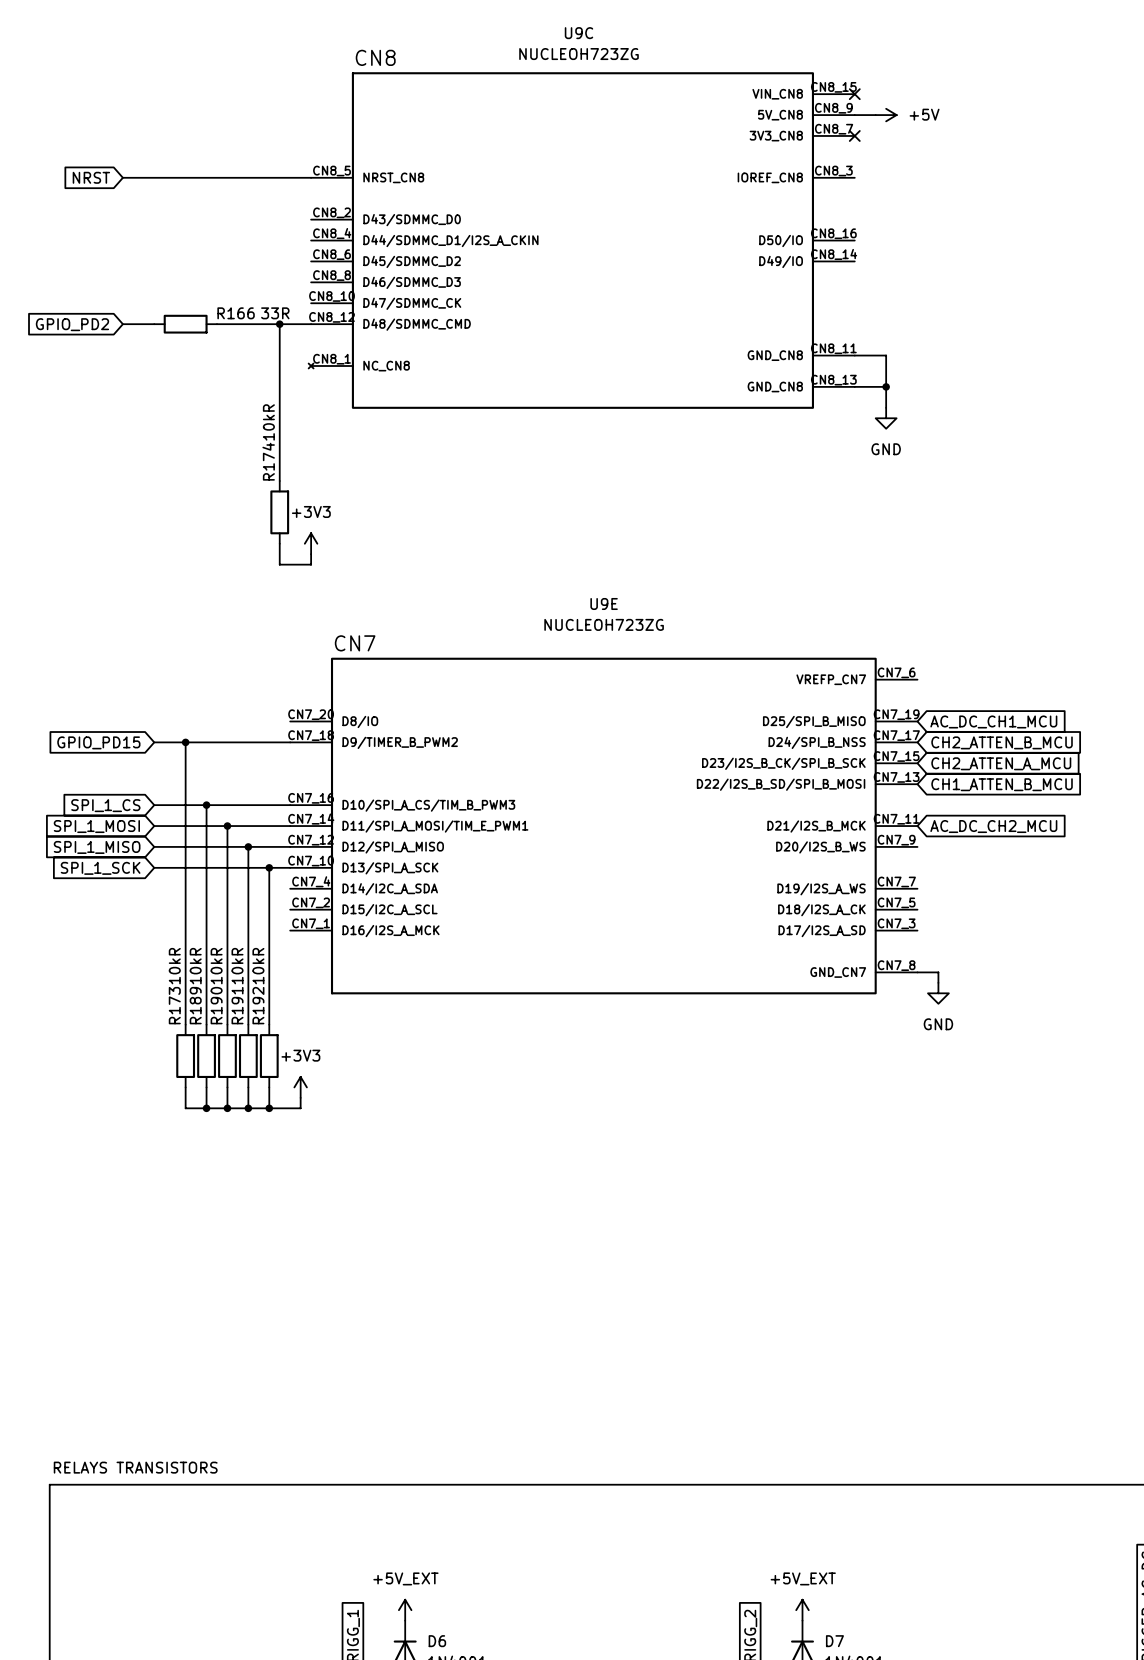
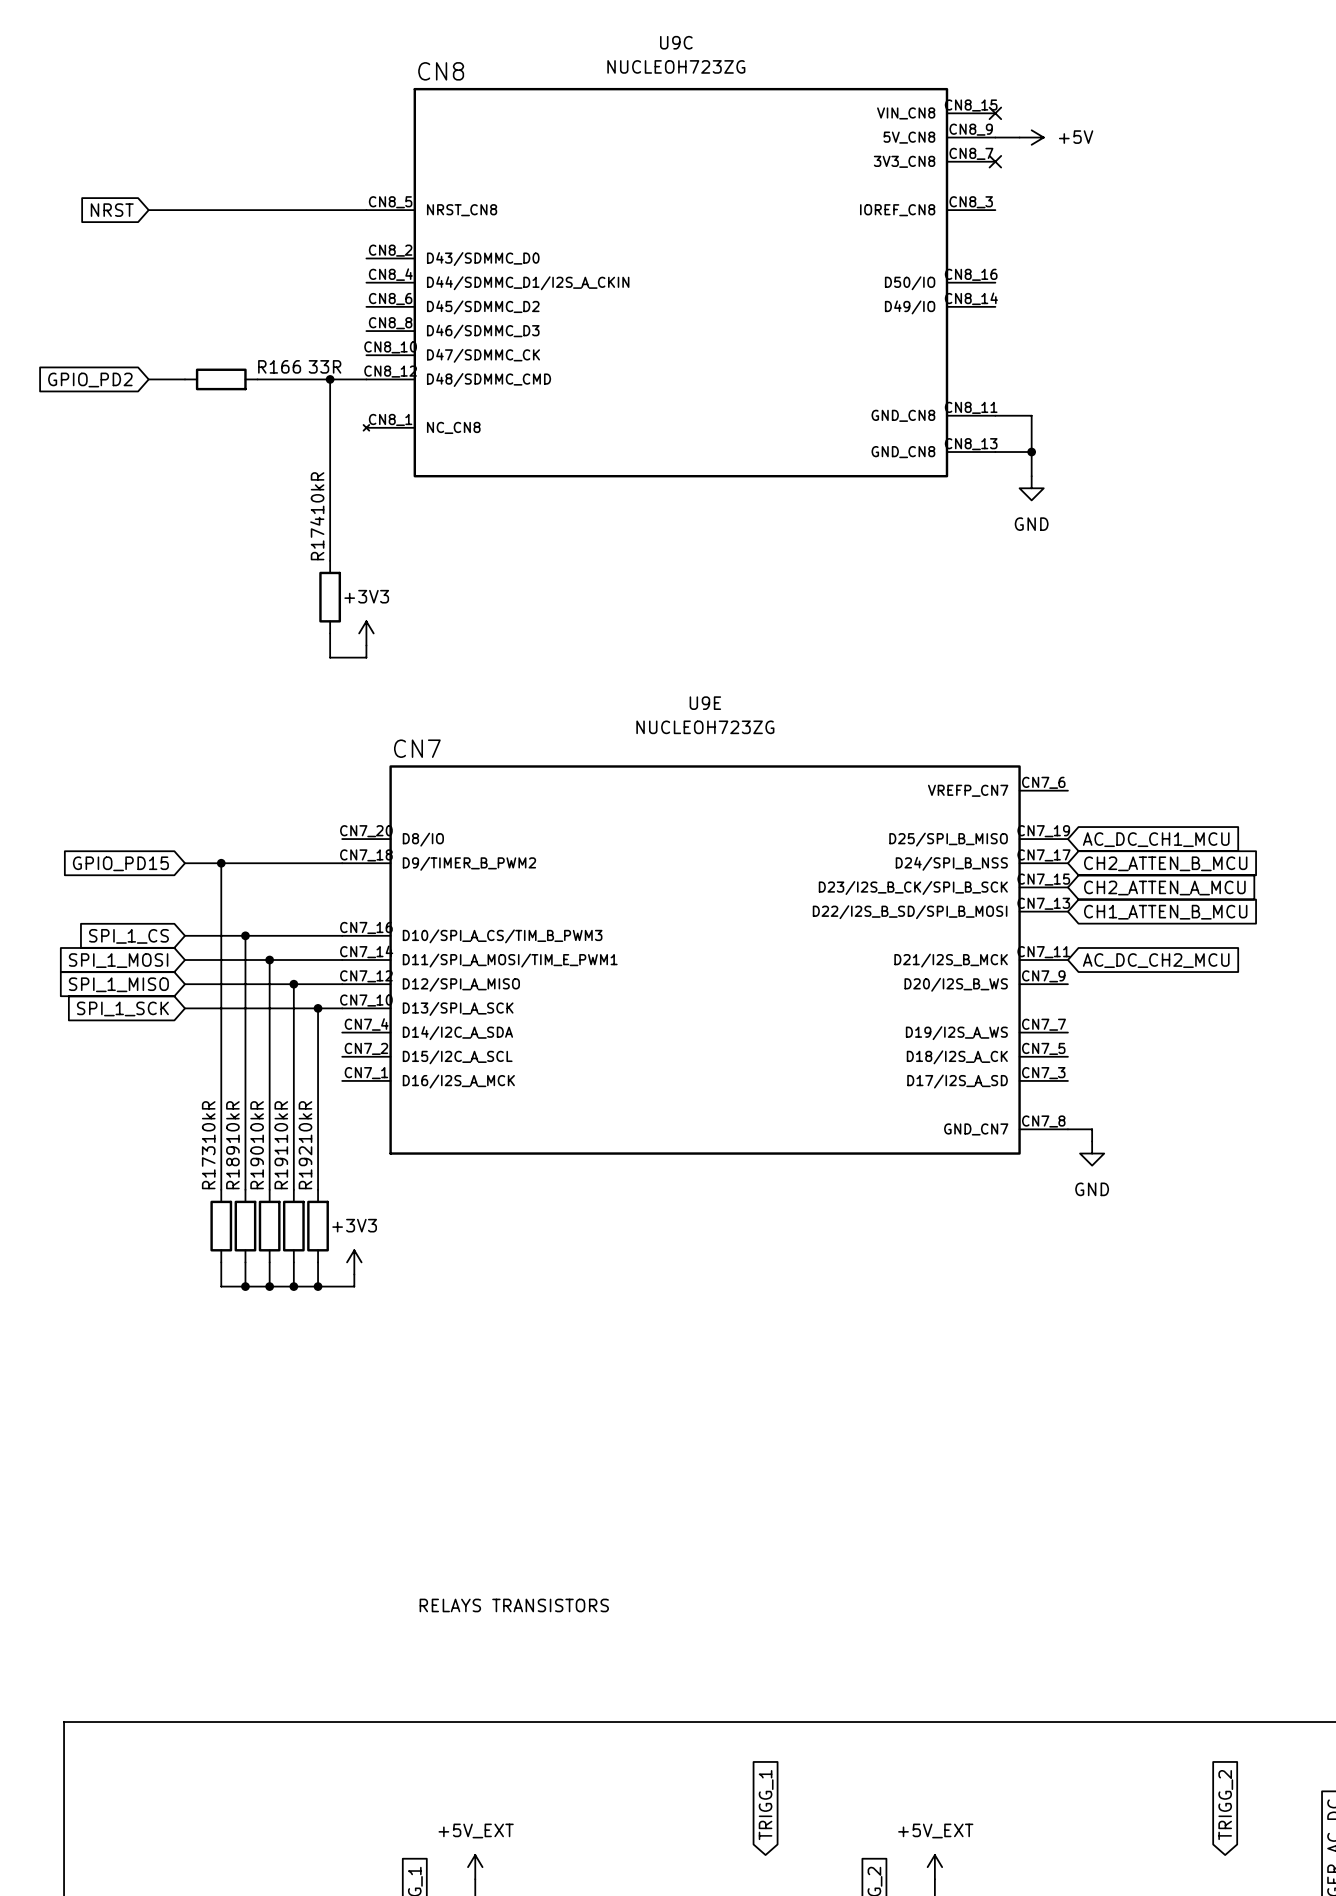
text: none -> RELAYS TRANSISTORS (514, 1605)
text: RELAYS TRANSISTORS (135, 1467) -> none
global label: none -> TRIGG_1 (766, 1805)
global label: none -> TRIGG_2 (1225, 1805)

